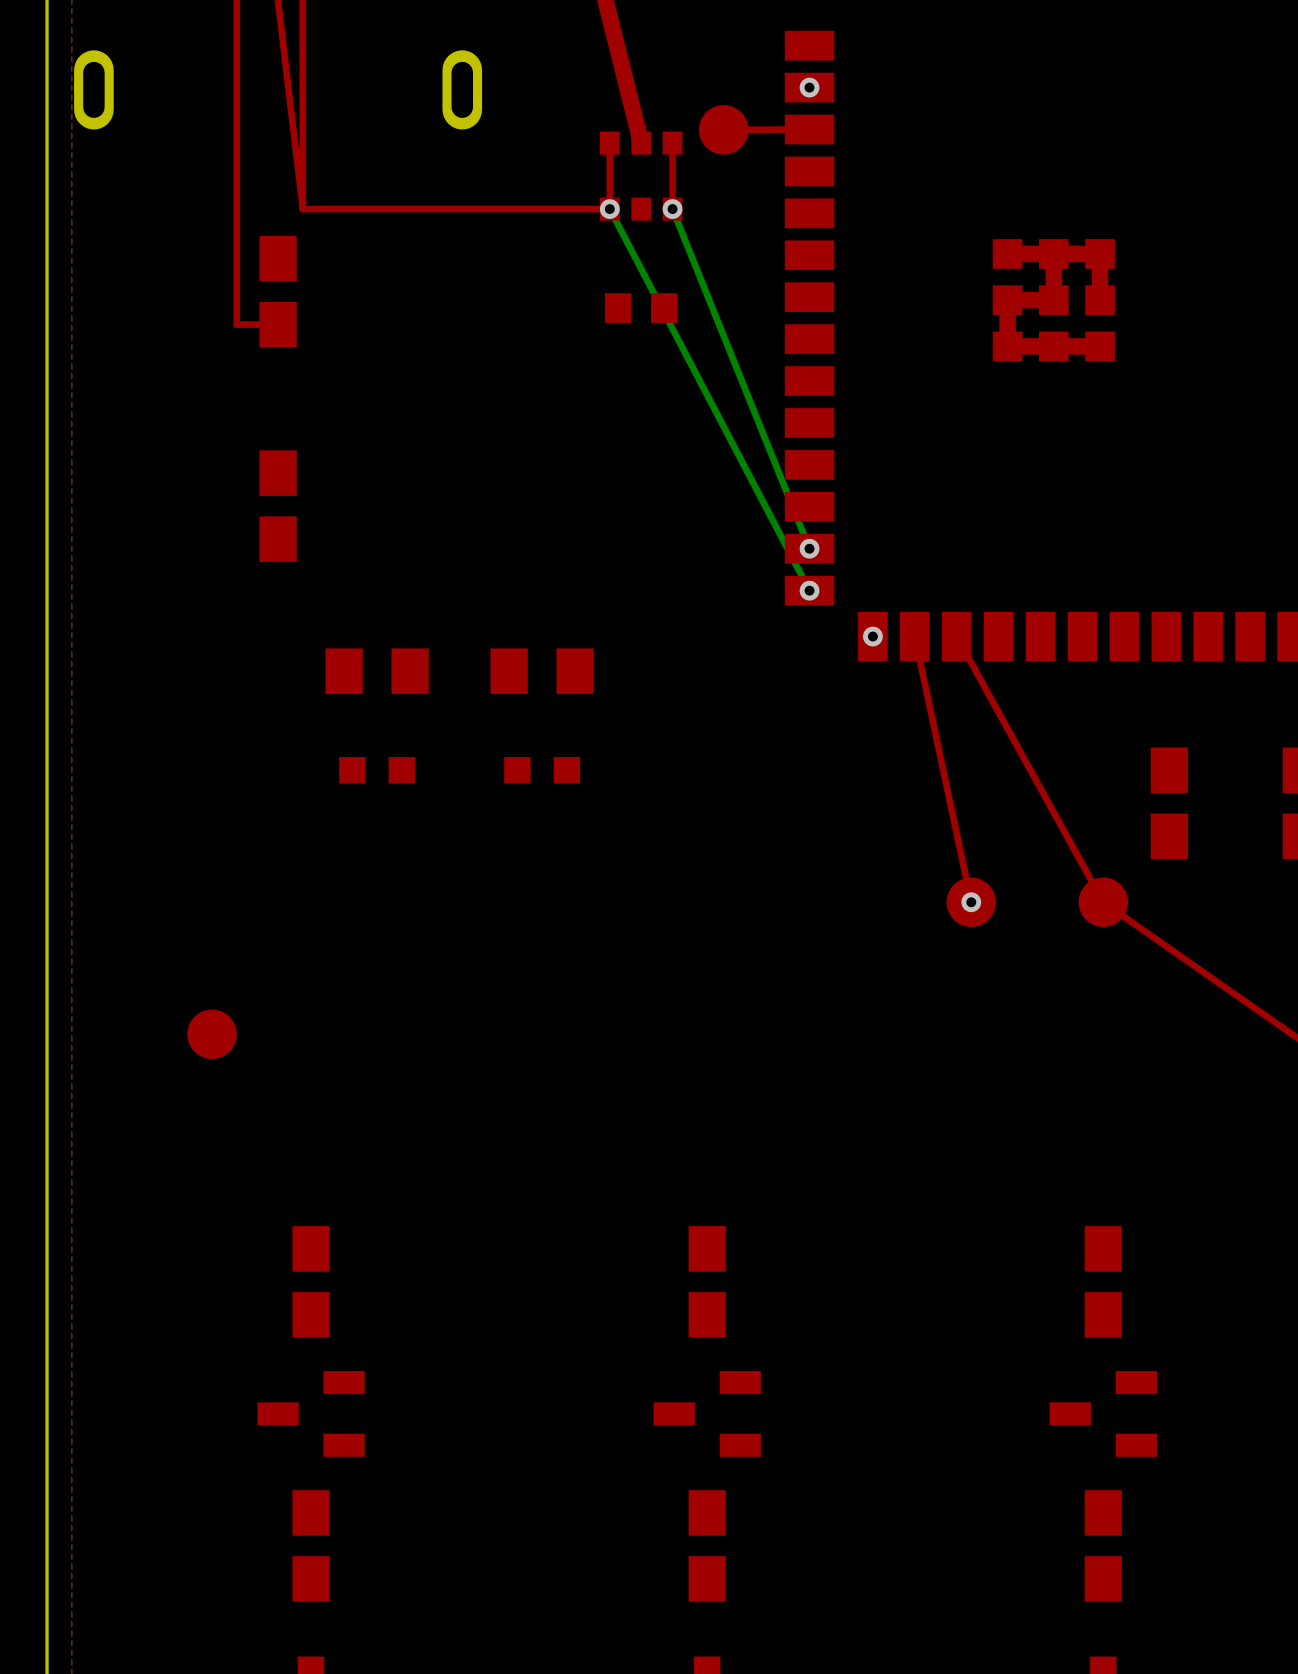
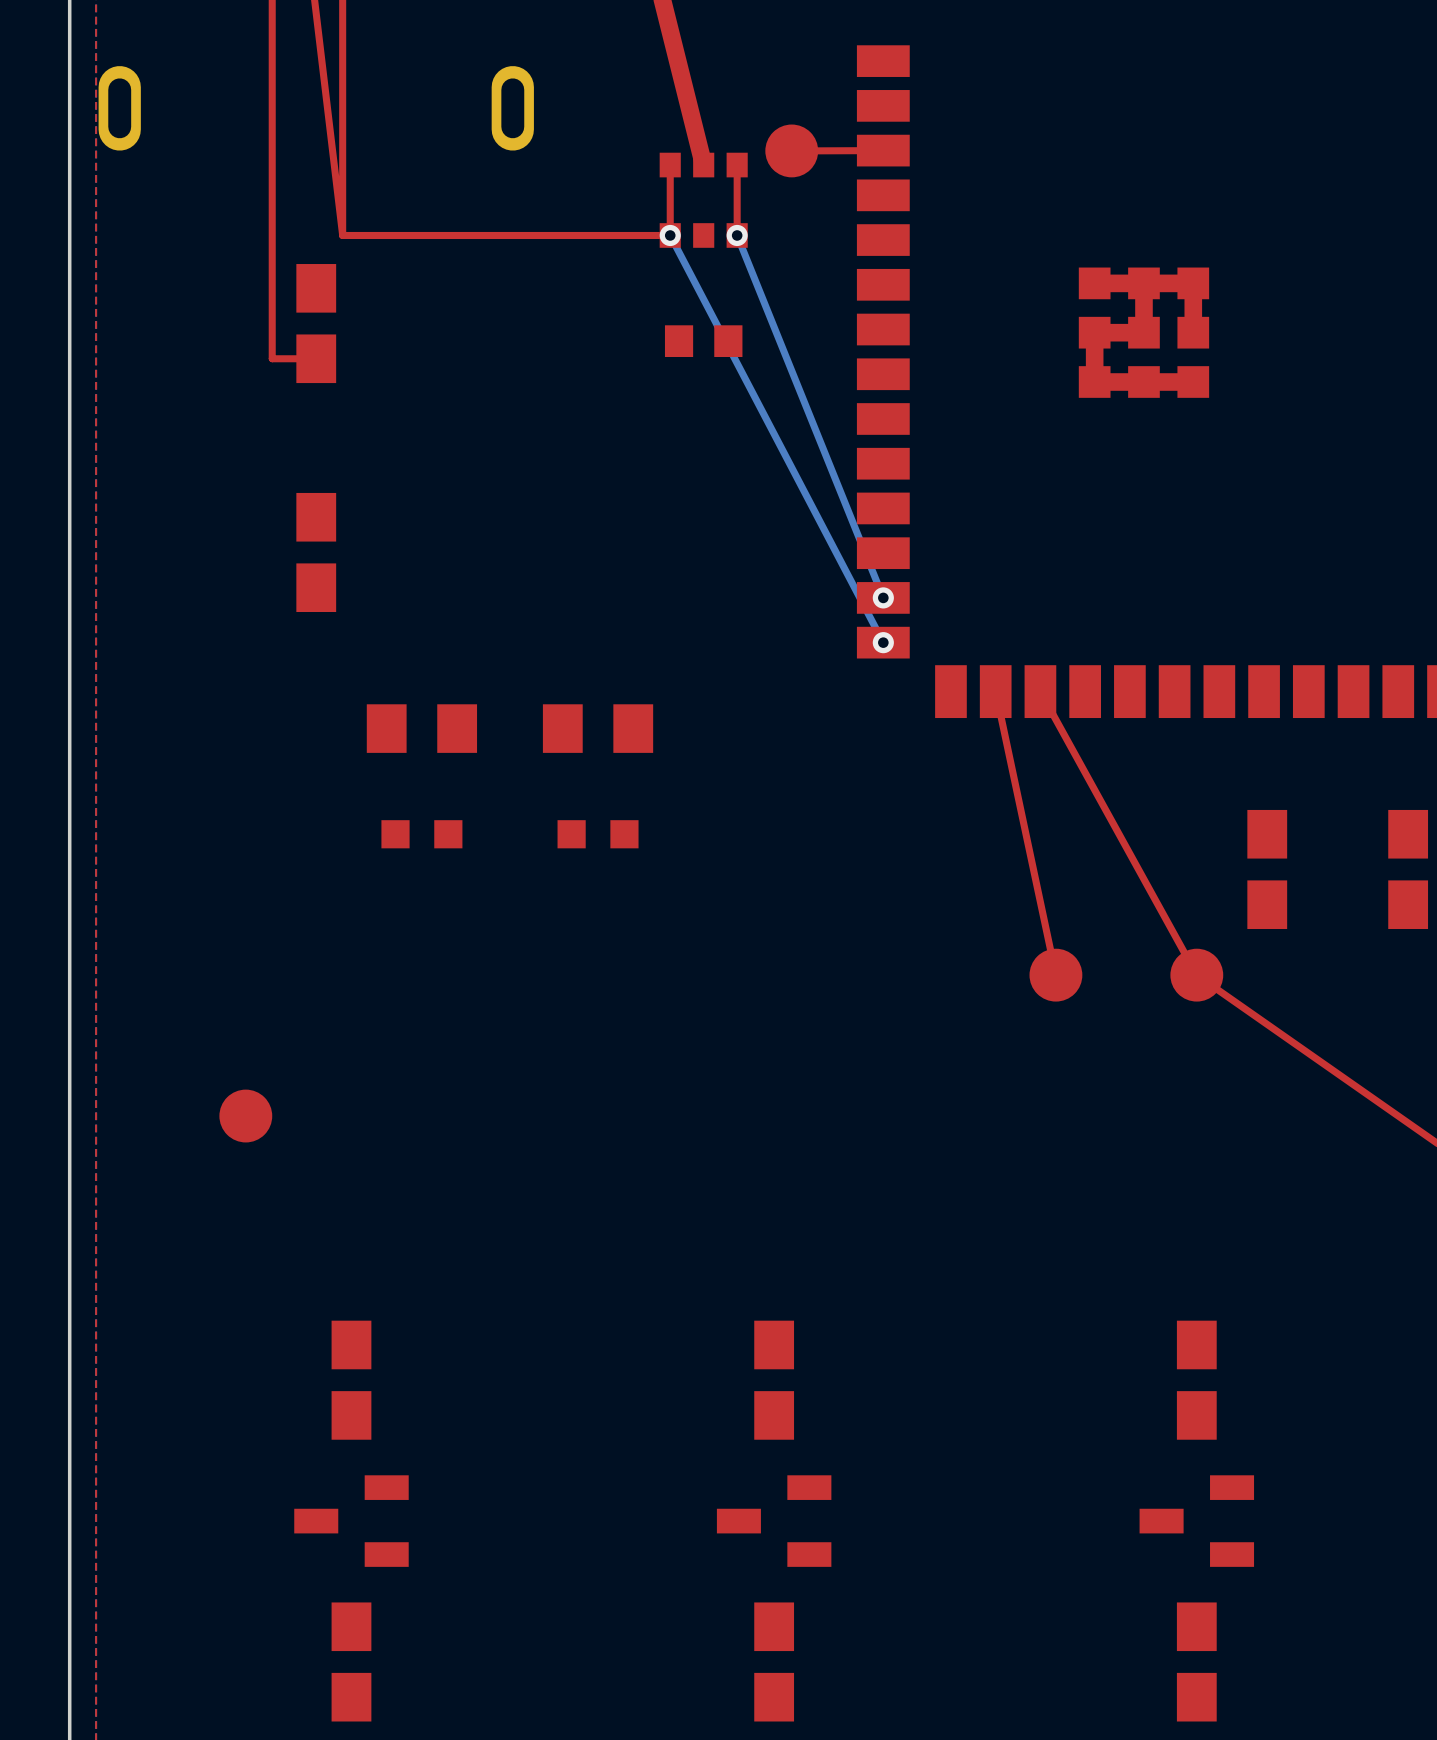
via: (809, 87) -> none
via: (872, 636) -> none
via: (971, 902) -> none

